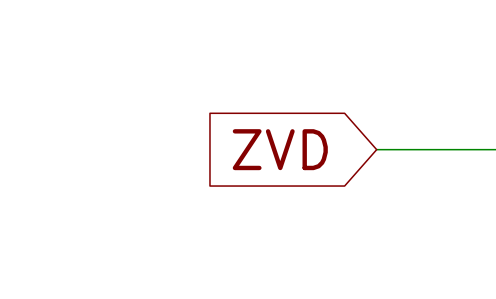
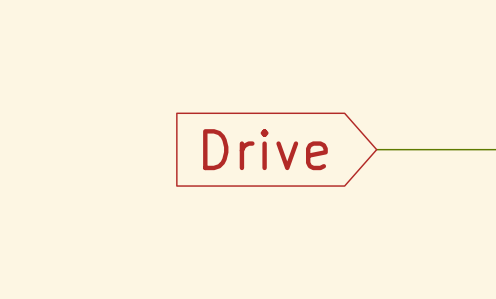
global label: ZVD (280, 149) -> Drive (265, 149)

